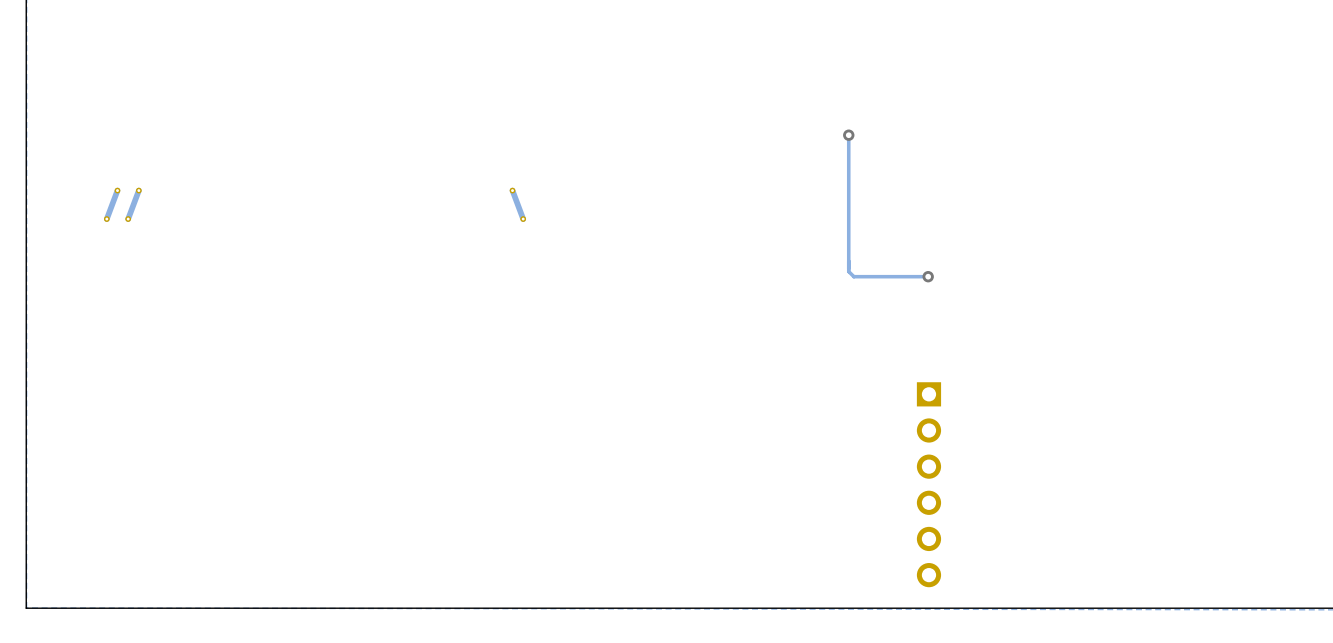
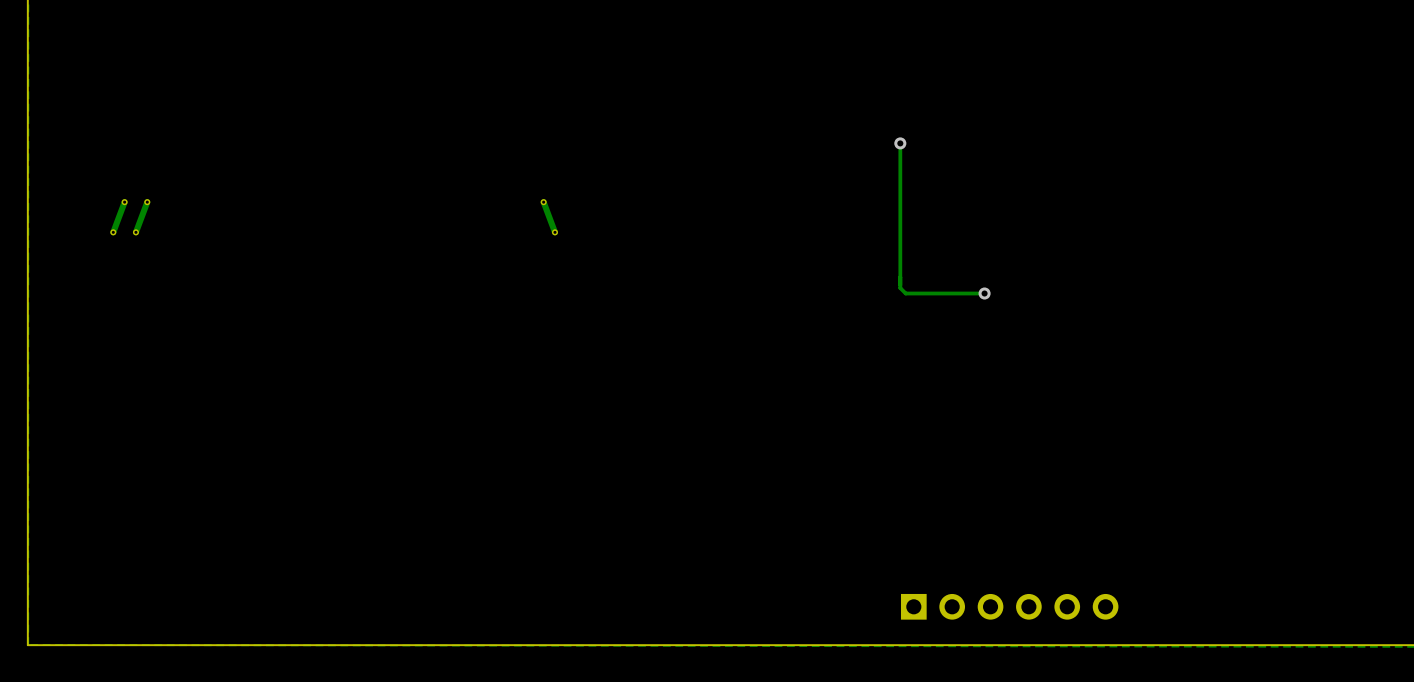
part rotation: 0° (928, 484) -> 90° counterclockwise (1009, 606)

